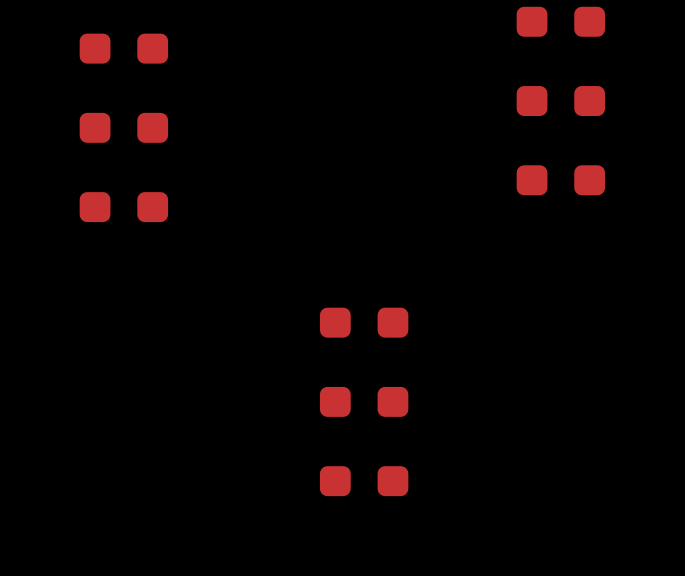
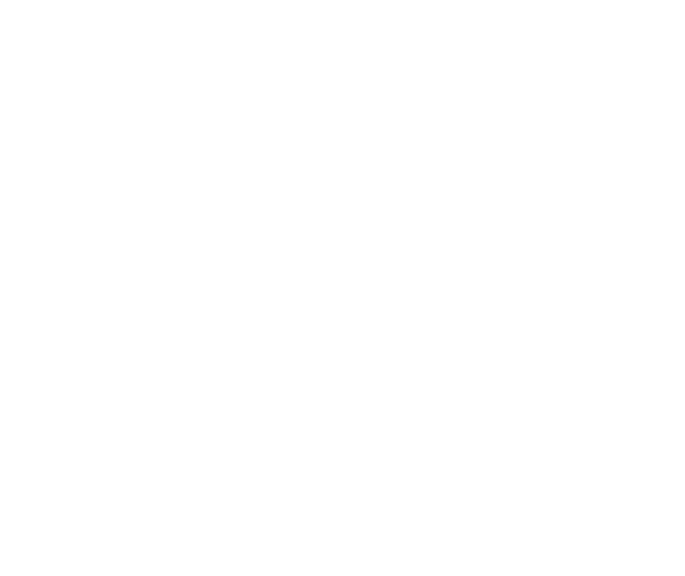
part: (560, 21) -> none
part: (123, 48) -> none
part: (560, 101) -> none
part: (123, 127) -> none
part: (560, 180) -> none
part: (123, 207) -> none
part: (364, 322) -> none
part: (364, 401) -> none
part: (364, 481) -> none

